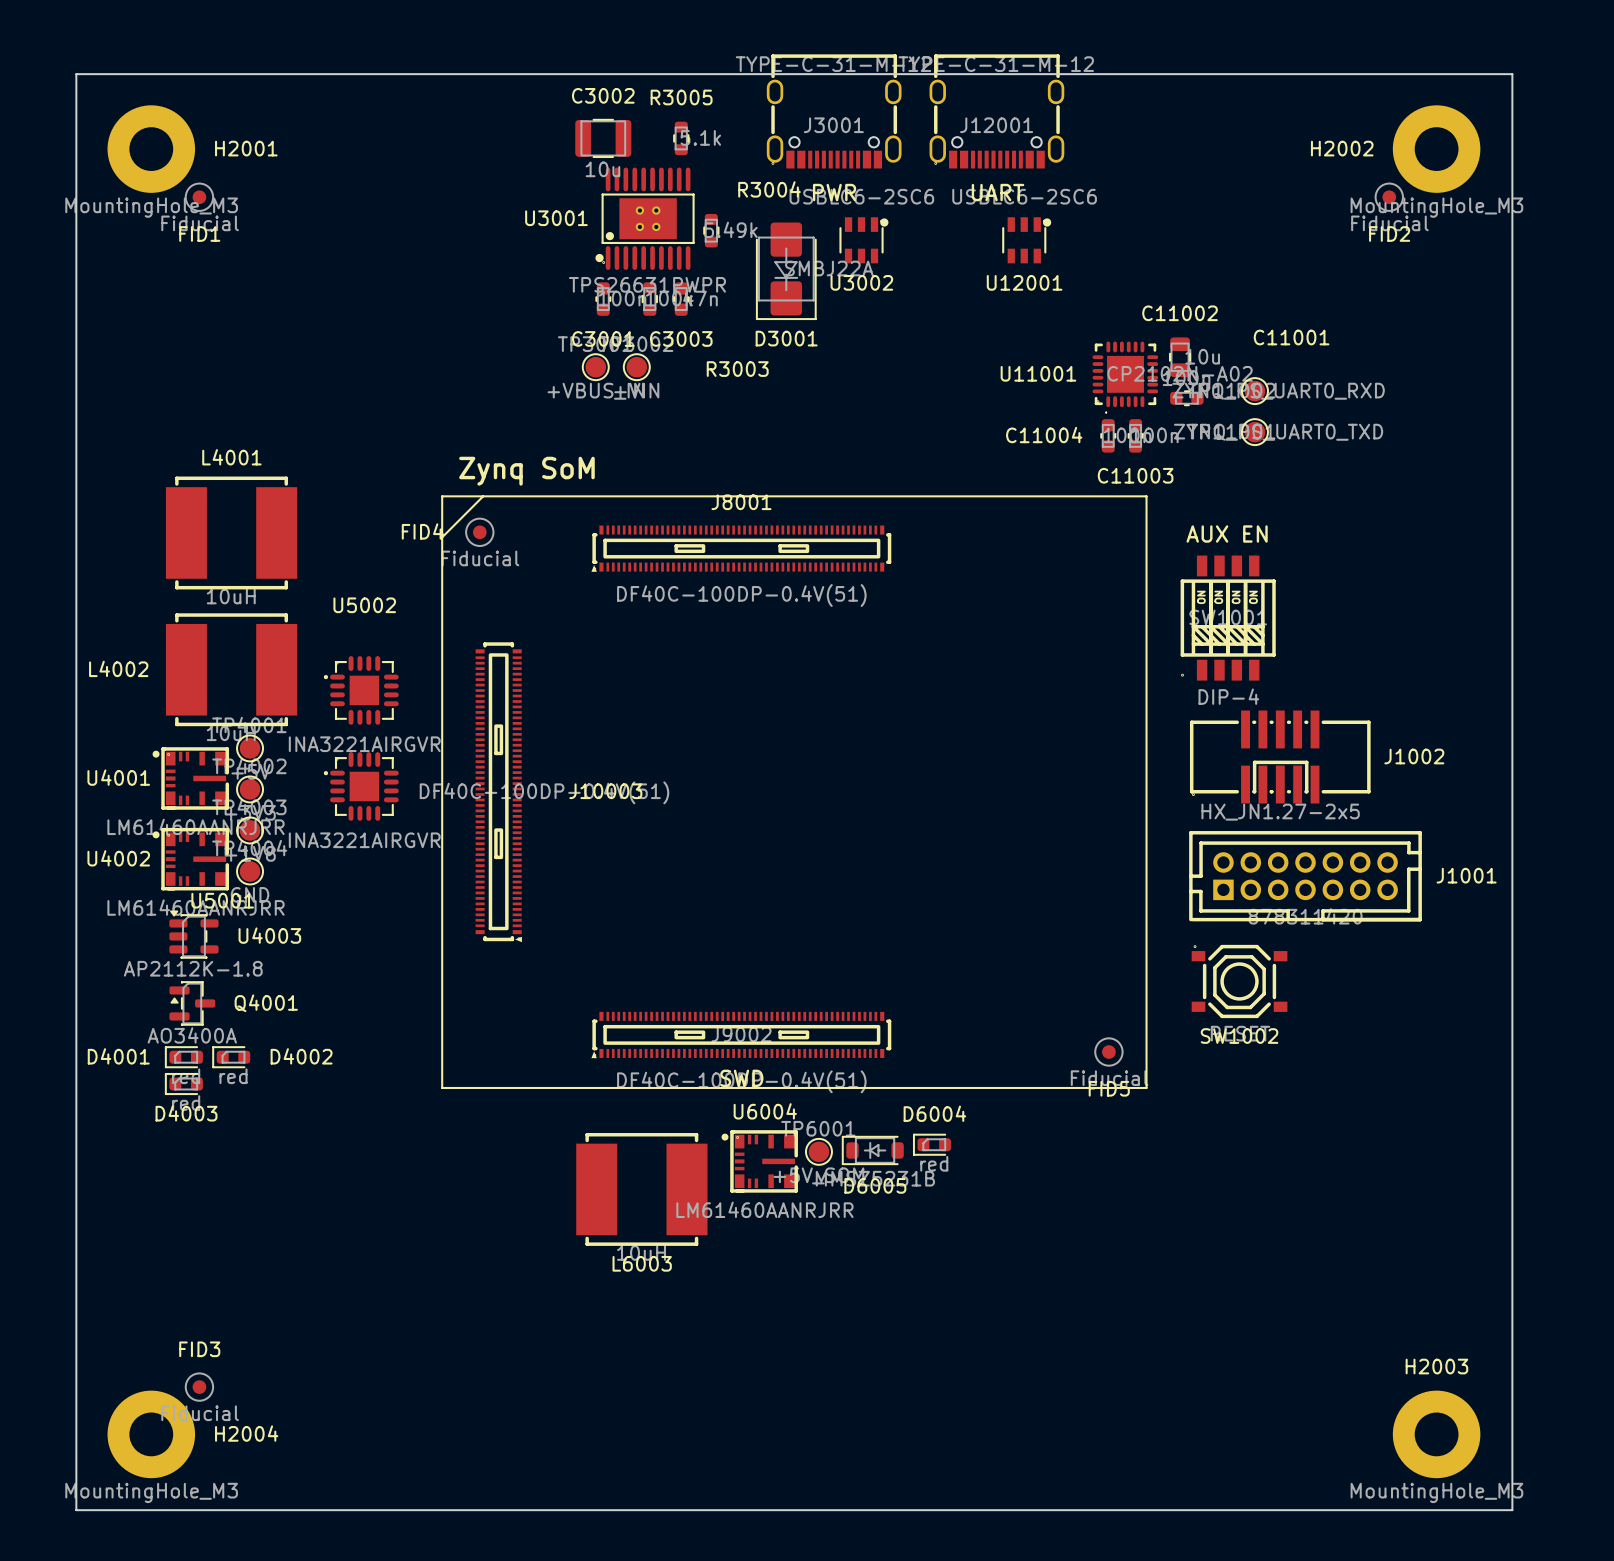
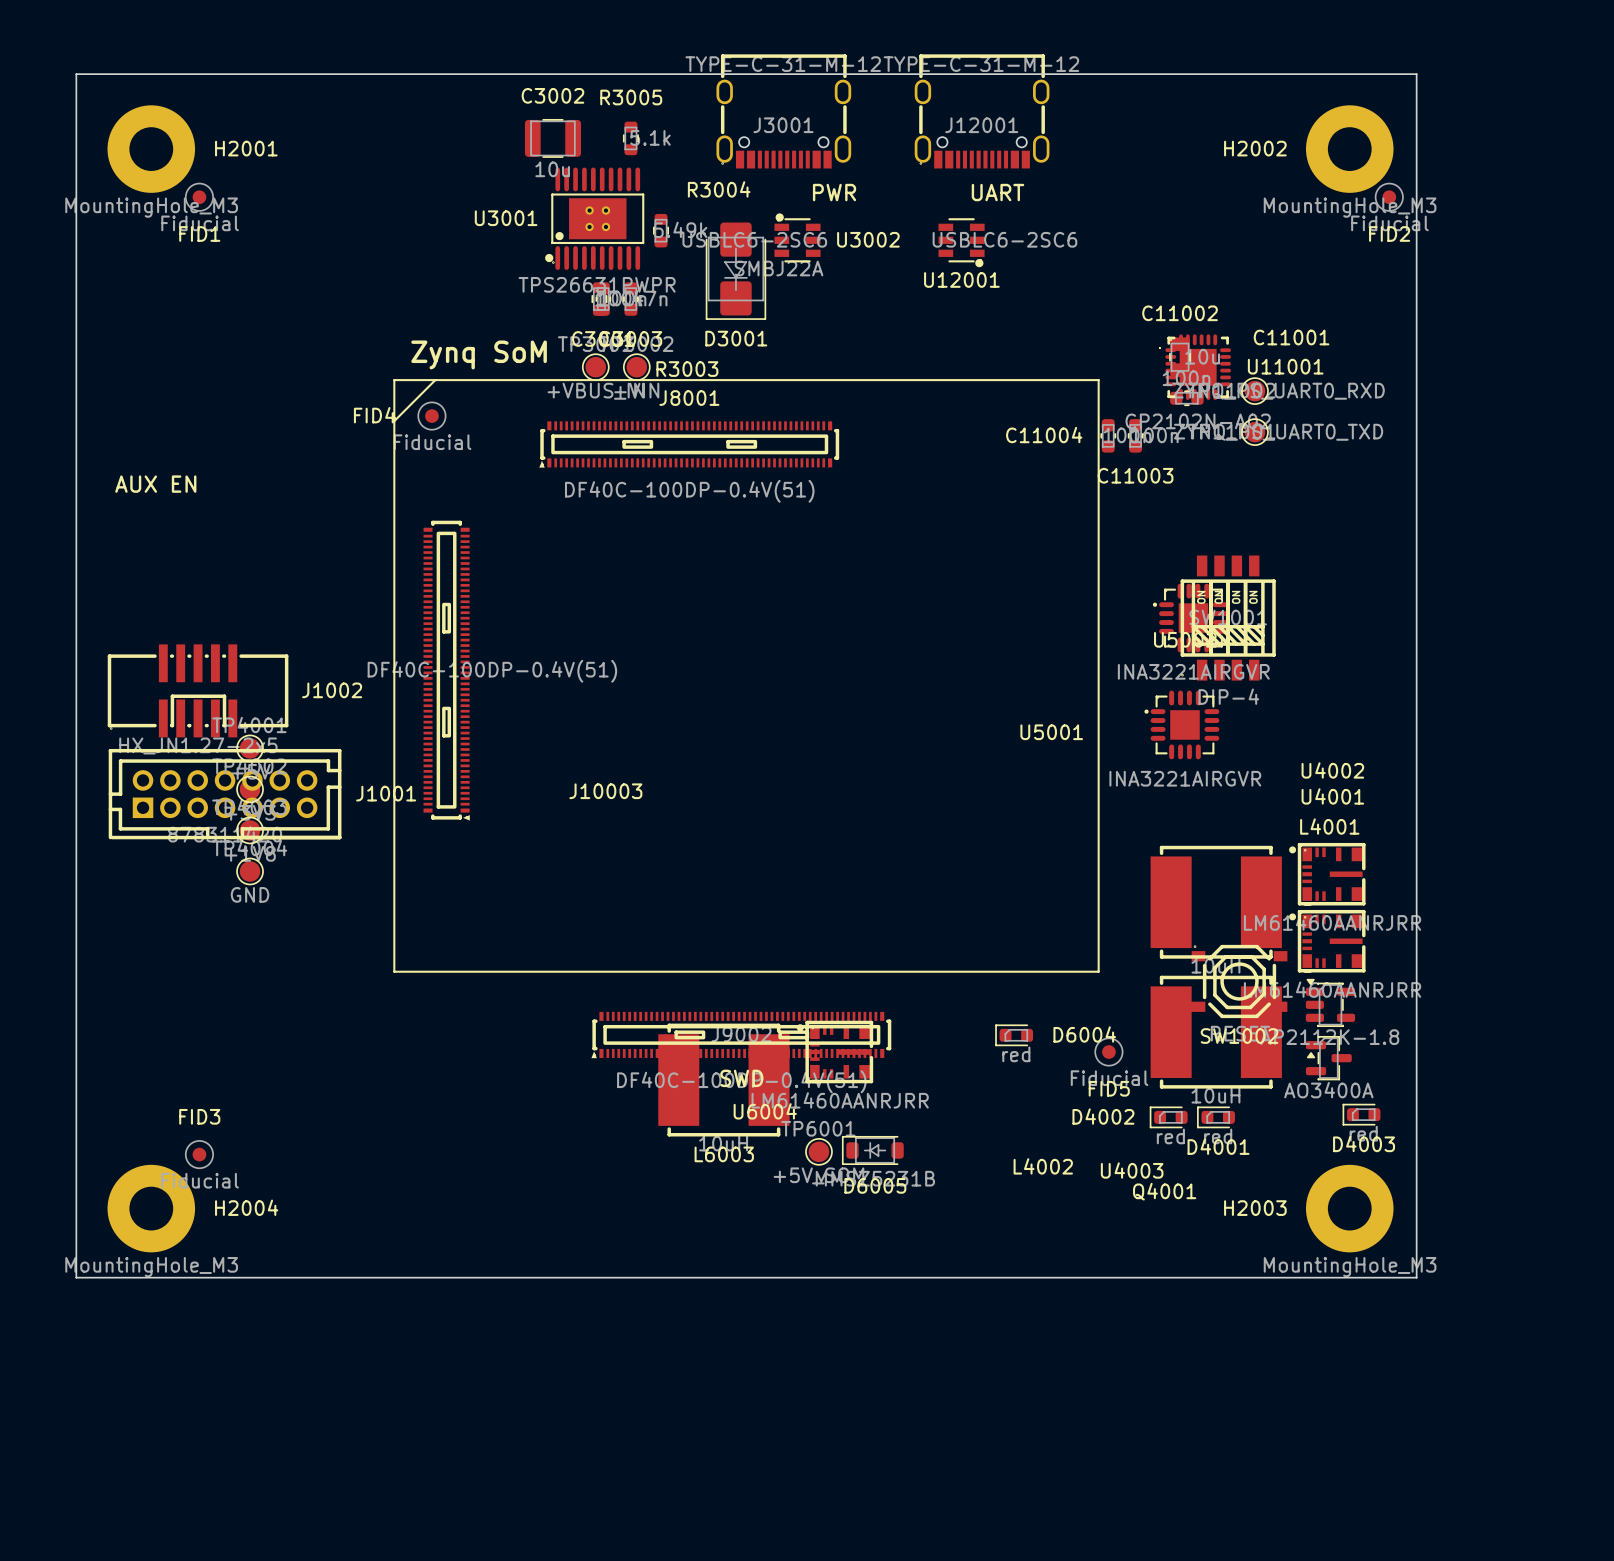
J3001 footprint: [766, 54, 902, 169] -> [716, 54, 852, 169]
J12001 footprint: [929, 54, 1065, 169] -> [914, 54, 1050, 169]
board edge: (1416, 74) (1512, 74) (1512, 1510) (76, 1510) (76, 1277) -> (1416, 74) (1416, 1277) (76, 1277)
C3002 position: (603, 138) -> (552, 138)
R3005 position: (681, 138) -> (630, 138)
H2002 position: (1436, 149) -> (1349, 149)
U3001 position: (645, 218) -> (594, 218)
R3004 position: (711, 230) -> (661, 230)
U3002 rotation: 0° (863, 240) -> 90° counterclockwise (797, 237)
U3002 position: (863, 240) -> (797, 237)
U12001 rotation: 0° (1026, 240) -> 90° clockwise (961, 242)
U12001 position: (1026, 240) -> (961, 242)
D3001 position: (786, 271) -> (735, 271)
R3003 position: (649, 299) -> (599, 299)
C3003 position: (681, 299) -> (630, 299)
U11001 name position: U11001 (1038, 373) -> U11001 (1285, 366)
U11001 rotation: 0° (1125, 377) -> 90° clockwise (1195, 367)
U11001 position: (1125, 377) -> (1195, 367)
L4001 name position: L4001 (231, 457) -> L4001 (1329, 826)
text position: Zynq SoM (526, 471) -> Zynq SoM (479, 354)
text: none -> AUX EN (155, 484)
line: (442, 496) (1146, 496) (1146, 1087) (442, 1087) (442, 496) -> (394, 380) (1098, 380) (1098, 971) (394, 971) (394, 380)
line: (483, 496) (442, 537) -> (435, 380) (394, 421)
L4001 position: (231, 532) -> (1216, 902)
FID4 position: (479, 532) -> (431, 416)
text: AUX EN (1227, 534) -> none
J8001 position: (741, 548) -> (689, 444)
L4002 name position: L4002 (118, 668) -> L4002 (1043, 1166)
L4002 position: (231, 669) -> (1216, 1032)
U5002 position: (361, 690) -> (1181, 724)
J1002 position: (1280, 757) -> (198, 690)
U4001 name position: U4001 (118, 777) -> U4001 (1332, 796)
U4001 position: (190, 778) -> (1327, 874)
U5001 position: (361, 786) -> (1190, 618)
J10003 position: (498, 792) -> (446, 670)
U4002 name position: U4002 (118, 858) -> U4002 (1332, 770)
U4002 position: (190, 859) -> (1327, 941)
J1001 position: (1305, 876) -> (225, 794)
U4003 position: (193, 934) -> (1330, 1002)
U4003 name position: U4003 (269, 935) -> U4003 (1132, 1170)
Q4001 position: (192, 1003) -> (1328, 1058)
Q4001 name position: Q4001 (266, 1003) -> Q4001 (1164, 1191)
D4001 name position: D4001 (118, 1056) -> D4001 (1218, 1146)
D4002 name position: D4002 (301, 1056) -> D4002 (1103, 1116)
D4001 position: (183, 1057) -> (1216, 1117)
D4002 position: (231, 1057) -> (1168, 1117)
D4003 position: (183, 1084) -> (1361, 1114)
D6004 name position: D6004 (934, 1113) -> D6004 (1084, 1034)
D6004 position: (932, 1144) -> (1014, 1035)
U6004 position: (759, 1161) -> (834, 1052)
L6003 position: (641, 1189) -> (723, 1080)
H2003 name position: H2003 (1436, 1366) -> H2003 (1255, 1208)
FID3 position: (199, 1387) -> (199, 1154)
H2004 position: (151, 1434) -> (151, 1208)
H2003 position: (1436, 1434) -> (1349, 1208)

